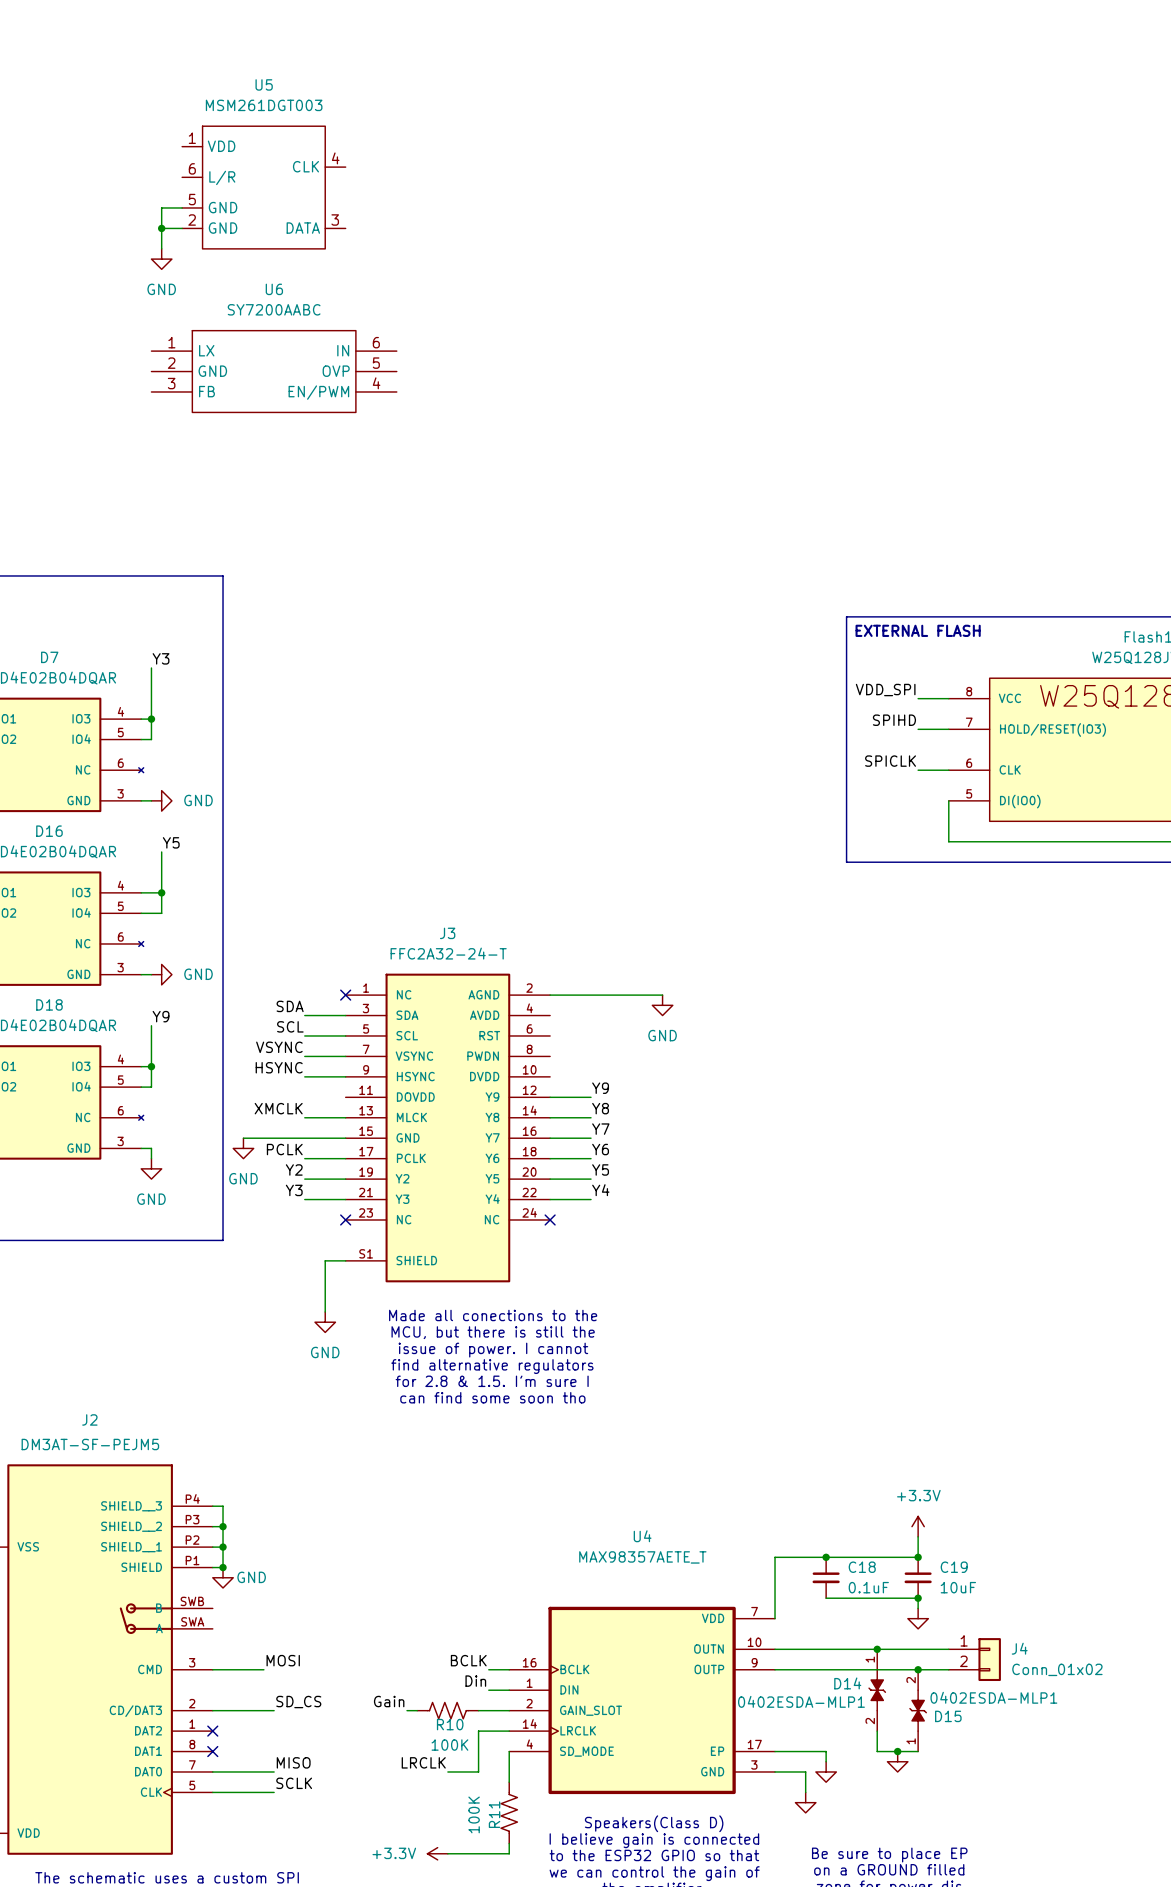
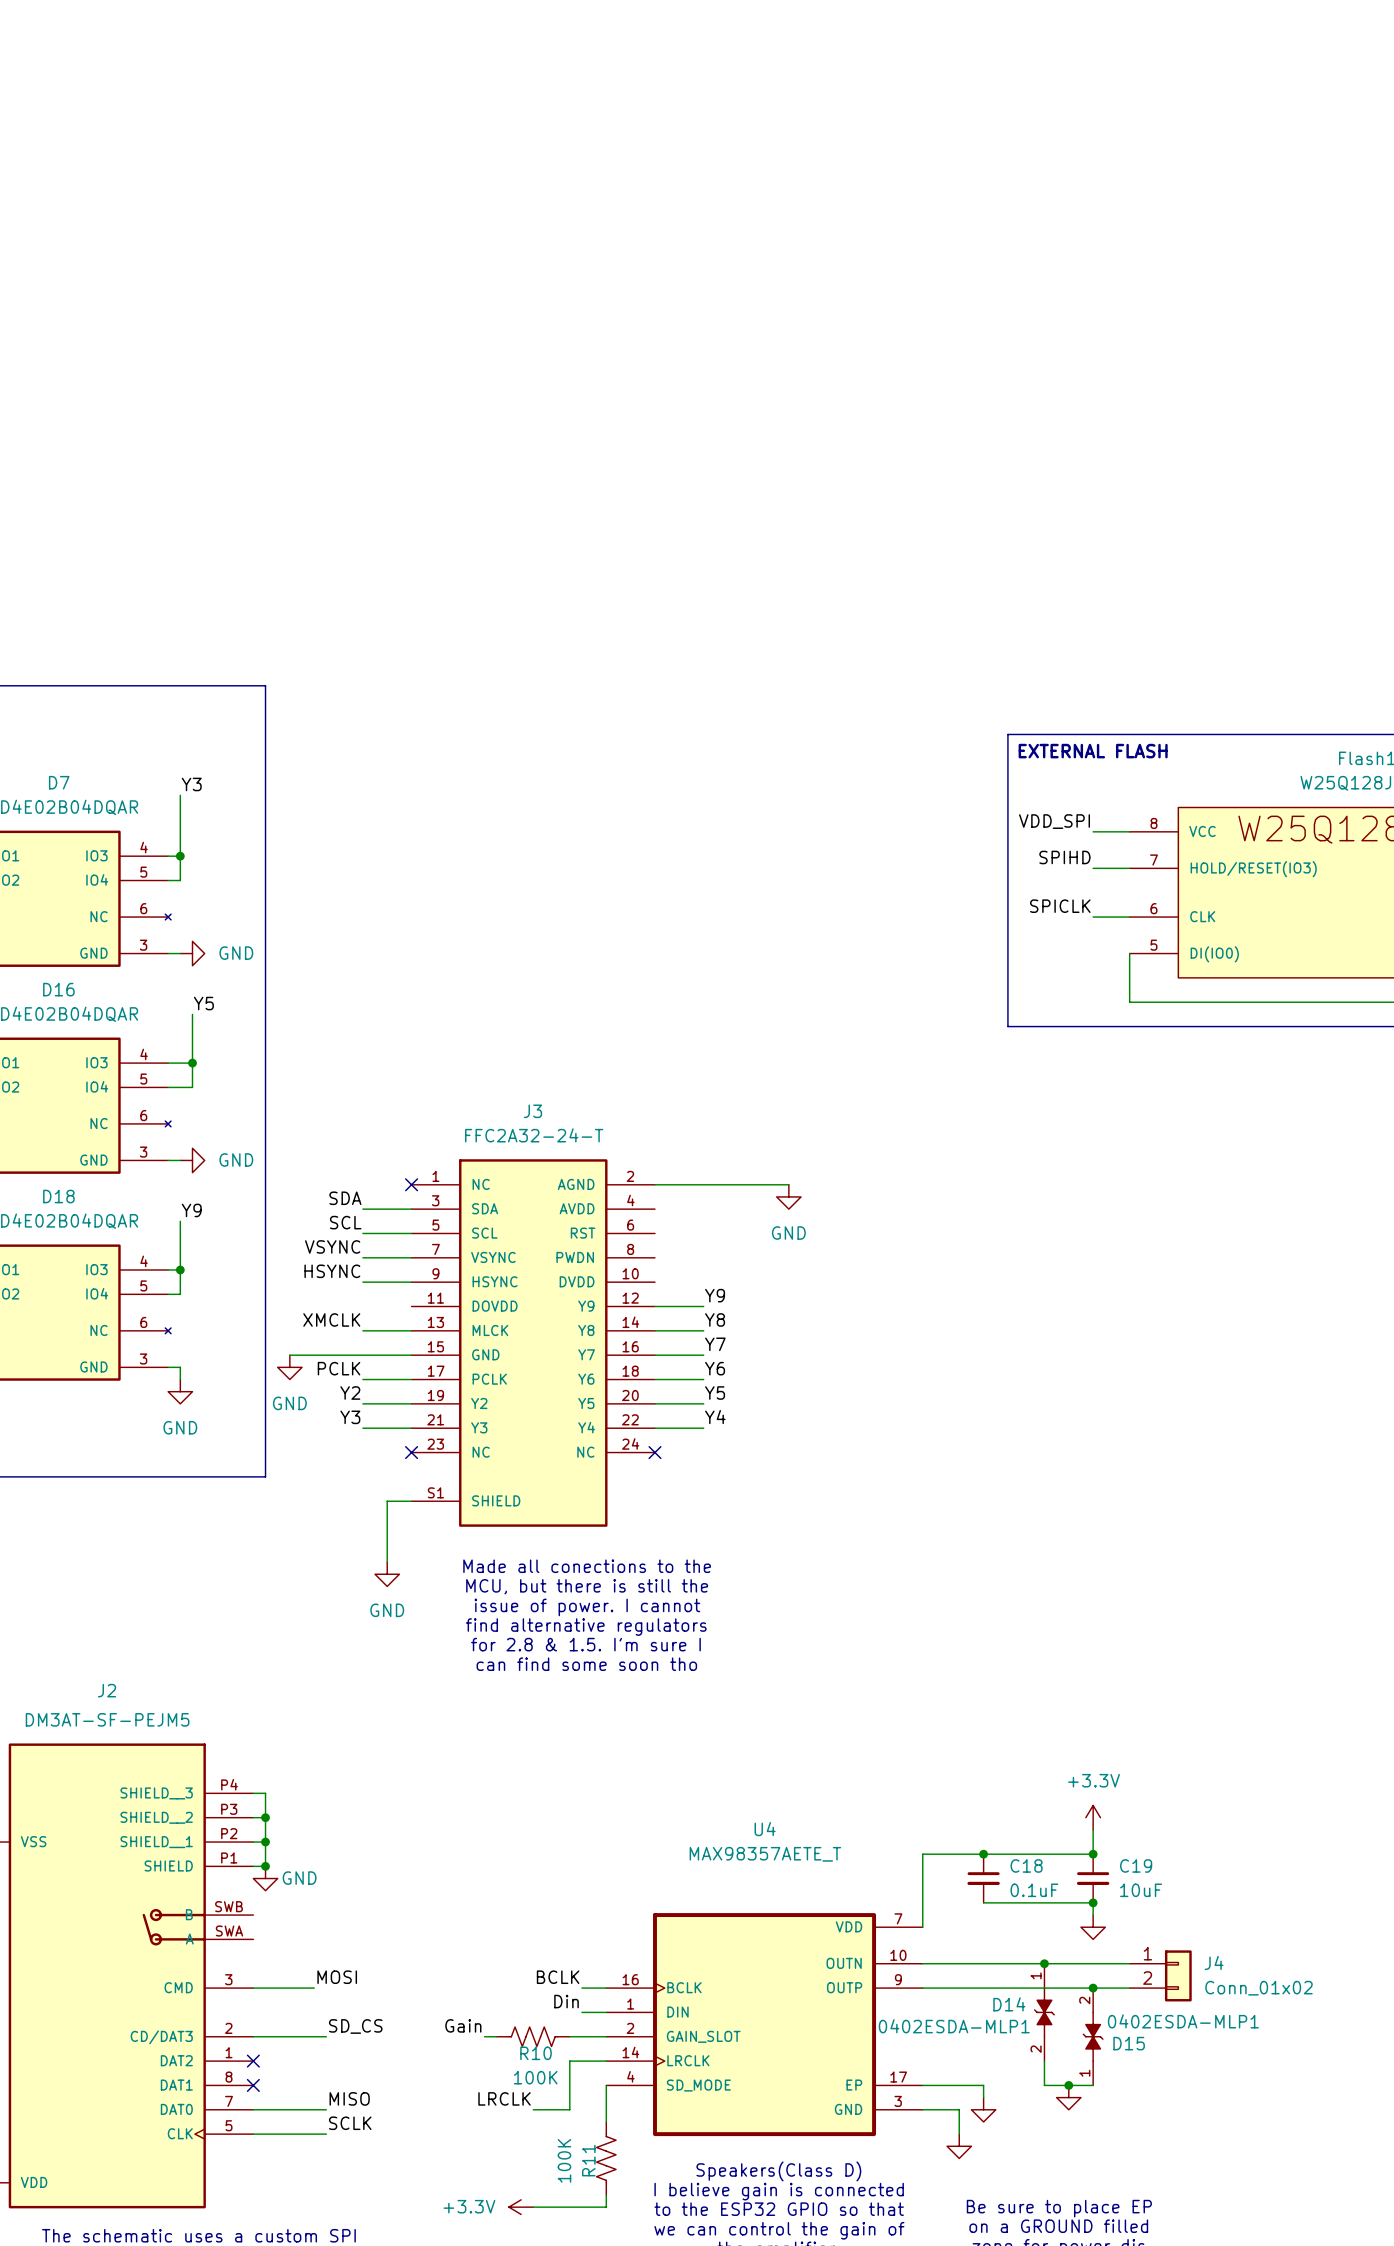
U5: MSM261DGT003 (263, 187) -> none
wire: (182, 207) (161, 207) (161, 248) -> none
wire: (161, 228) (182, 228) -> none
junction: (161, 228) -> none
power symbol: GND (161, 259) -> none
U6: SY7200AABC (274, 371) -> none

